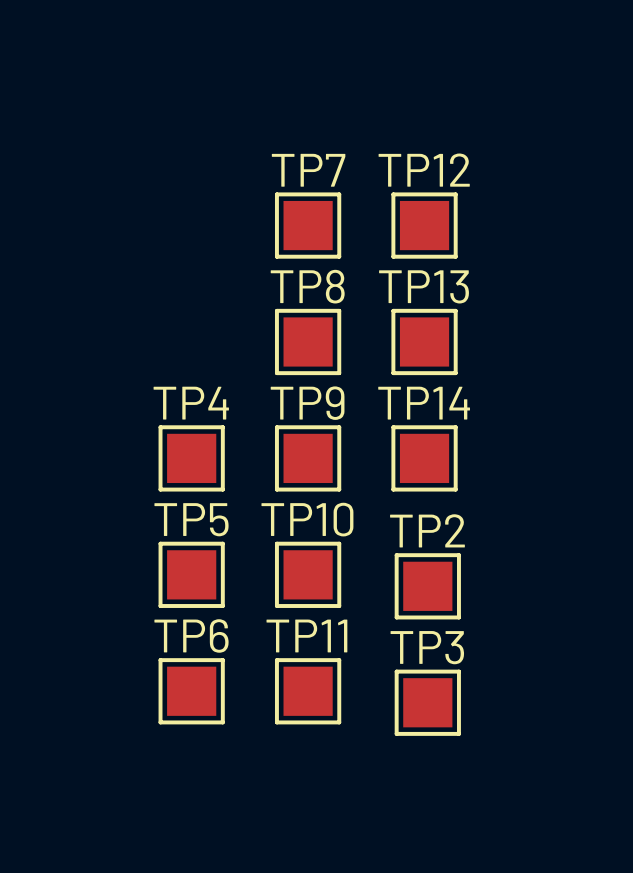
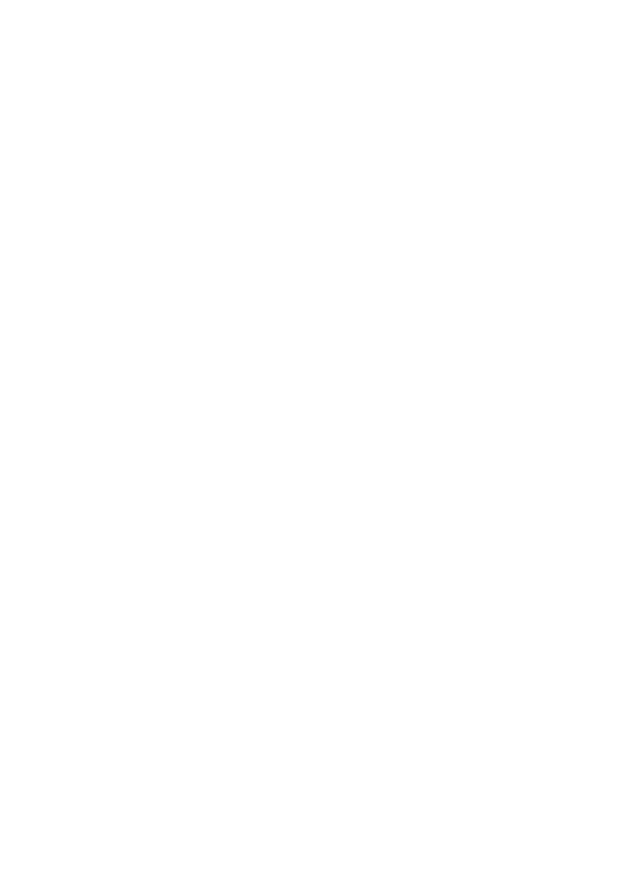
TP7: (308, 225) -> none
TP12: (424, 225) -> none
TP8: (308, 341) -> none
TP13: (424, 341) -> none
TP4: (191, 458) -> none
TP9: (308, 458) -> none
TP14: (424, 458) -> none
TP5: (191, 574) -> none
TP10: (308, 574) -> none
TP2: (427, 586) -> none
TP6: (191, 691) -> none
TP11: (308, 691) -> none
TP3: (427, 702) -> none

